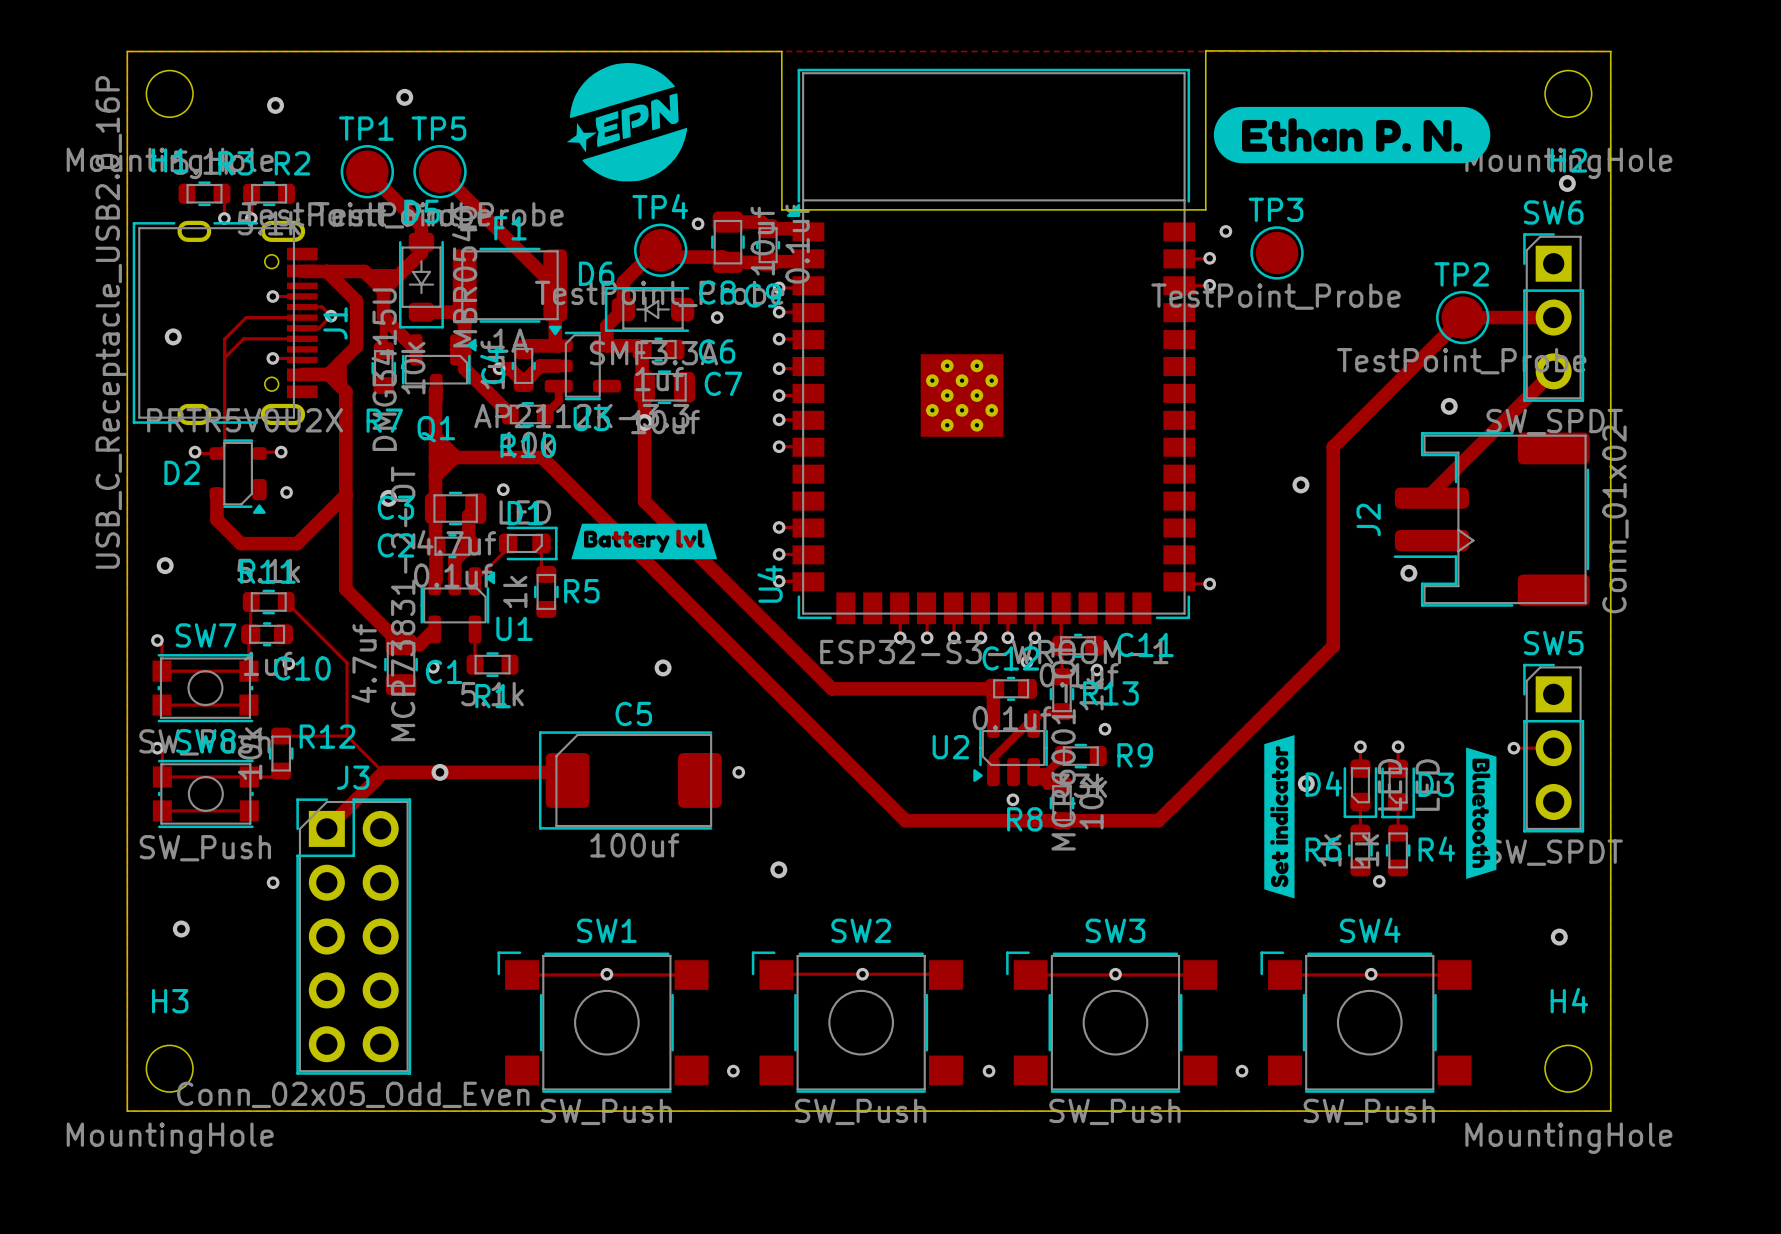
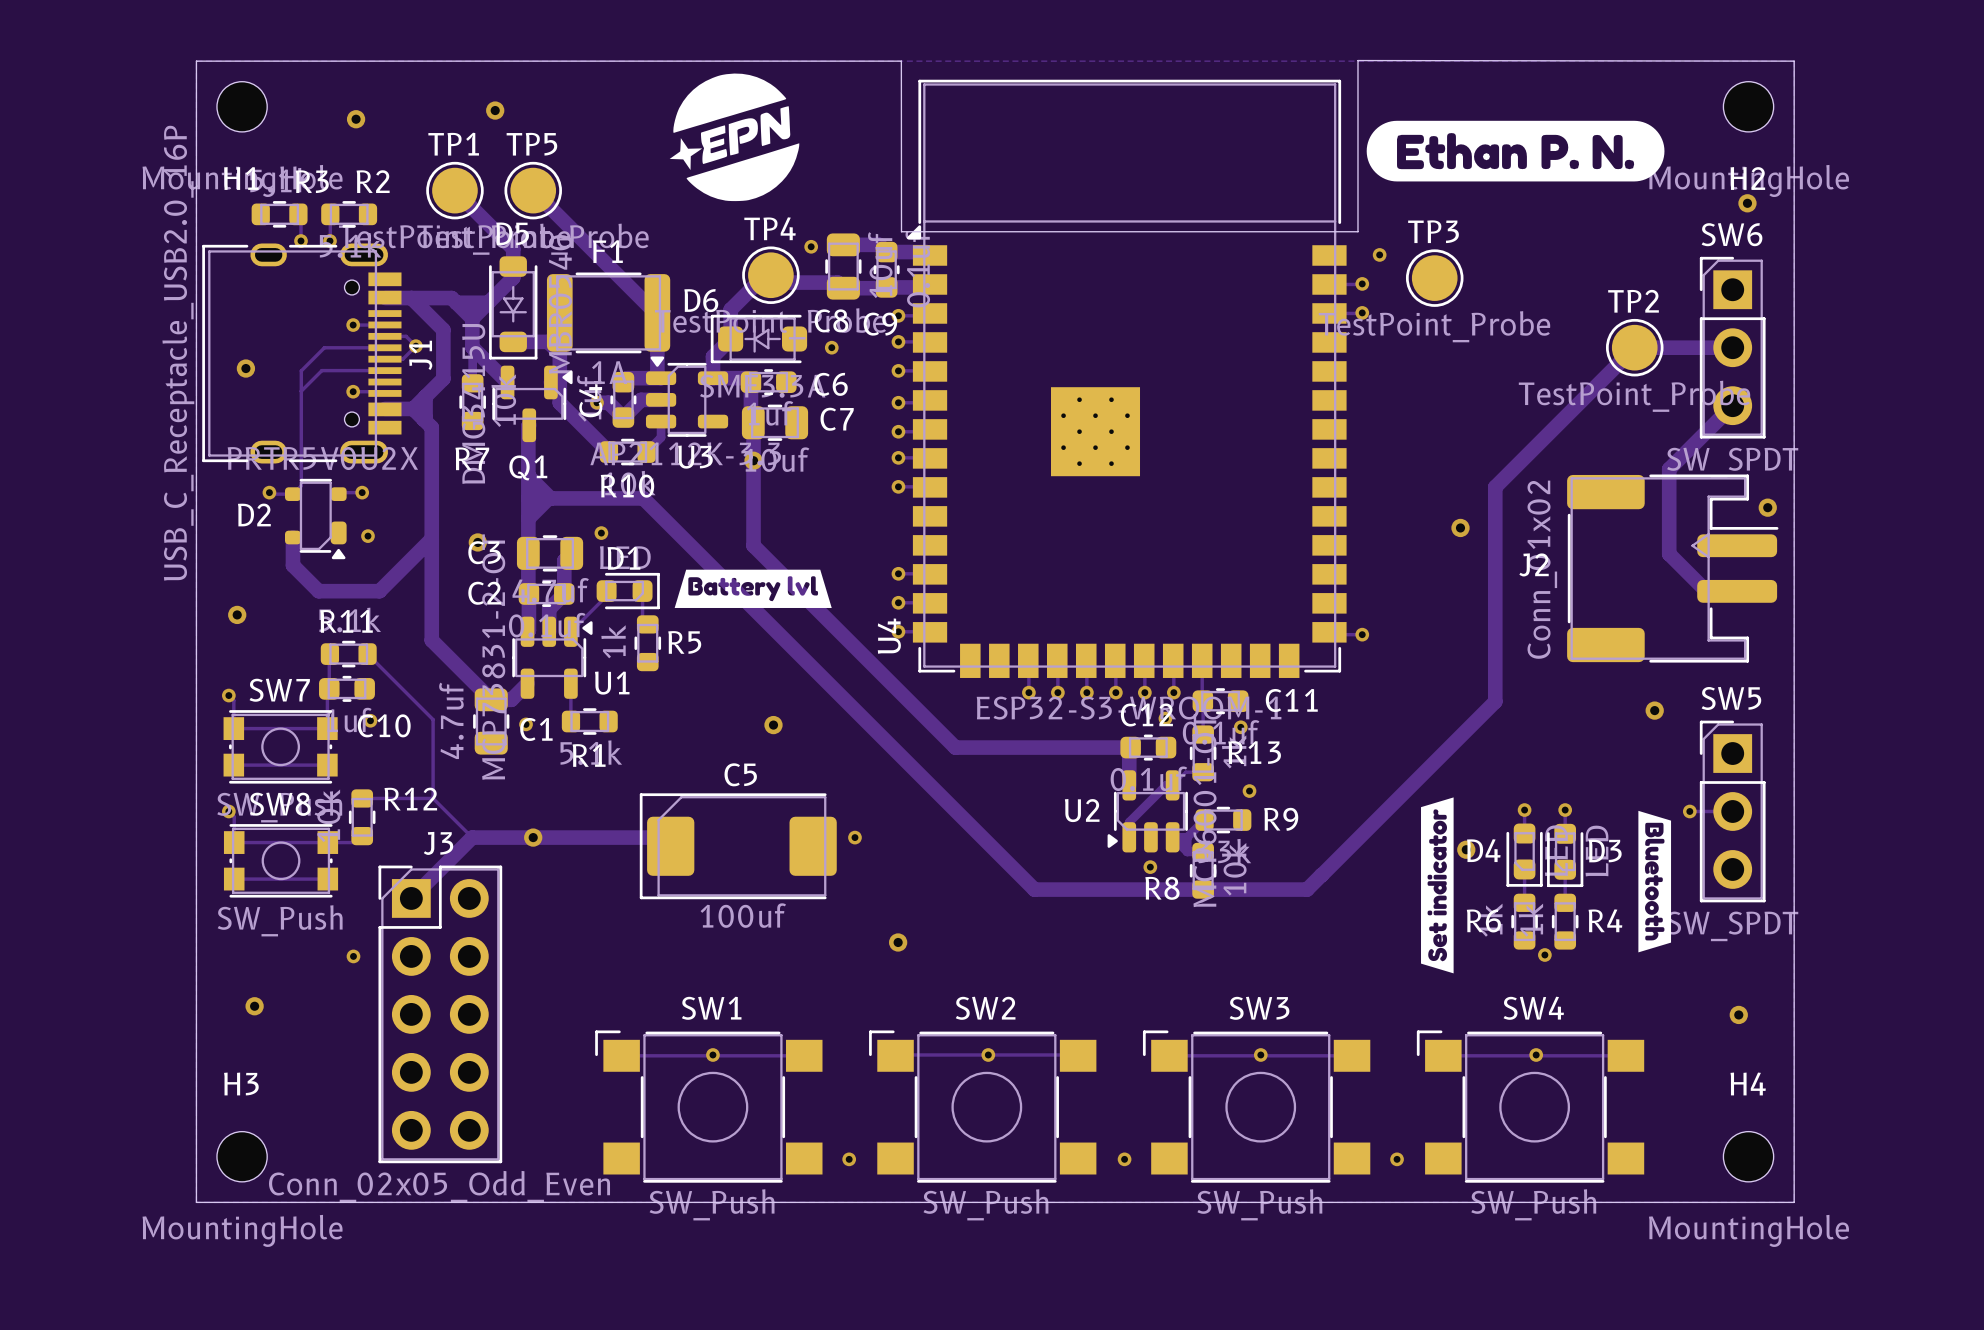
via: (1449, 406) -> none
track: (1494, 430) (1431, 493) (1431, 498) -> (1669, 469) (1669, 554) (1706, 591) (1737, 591)
via: none -> (1767, 507)
J2 rotation: 0° (1491, 519) -> 180° (1672, 568)
via: (1408, 573) -> none
via: none -> (1654, 710)

